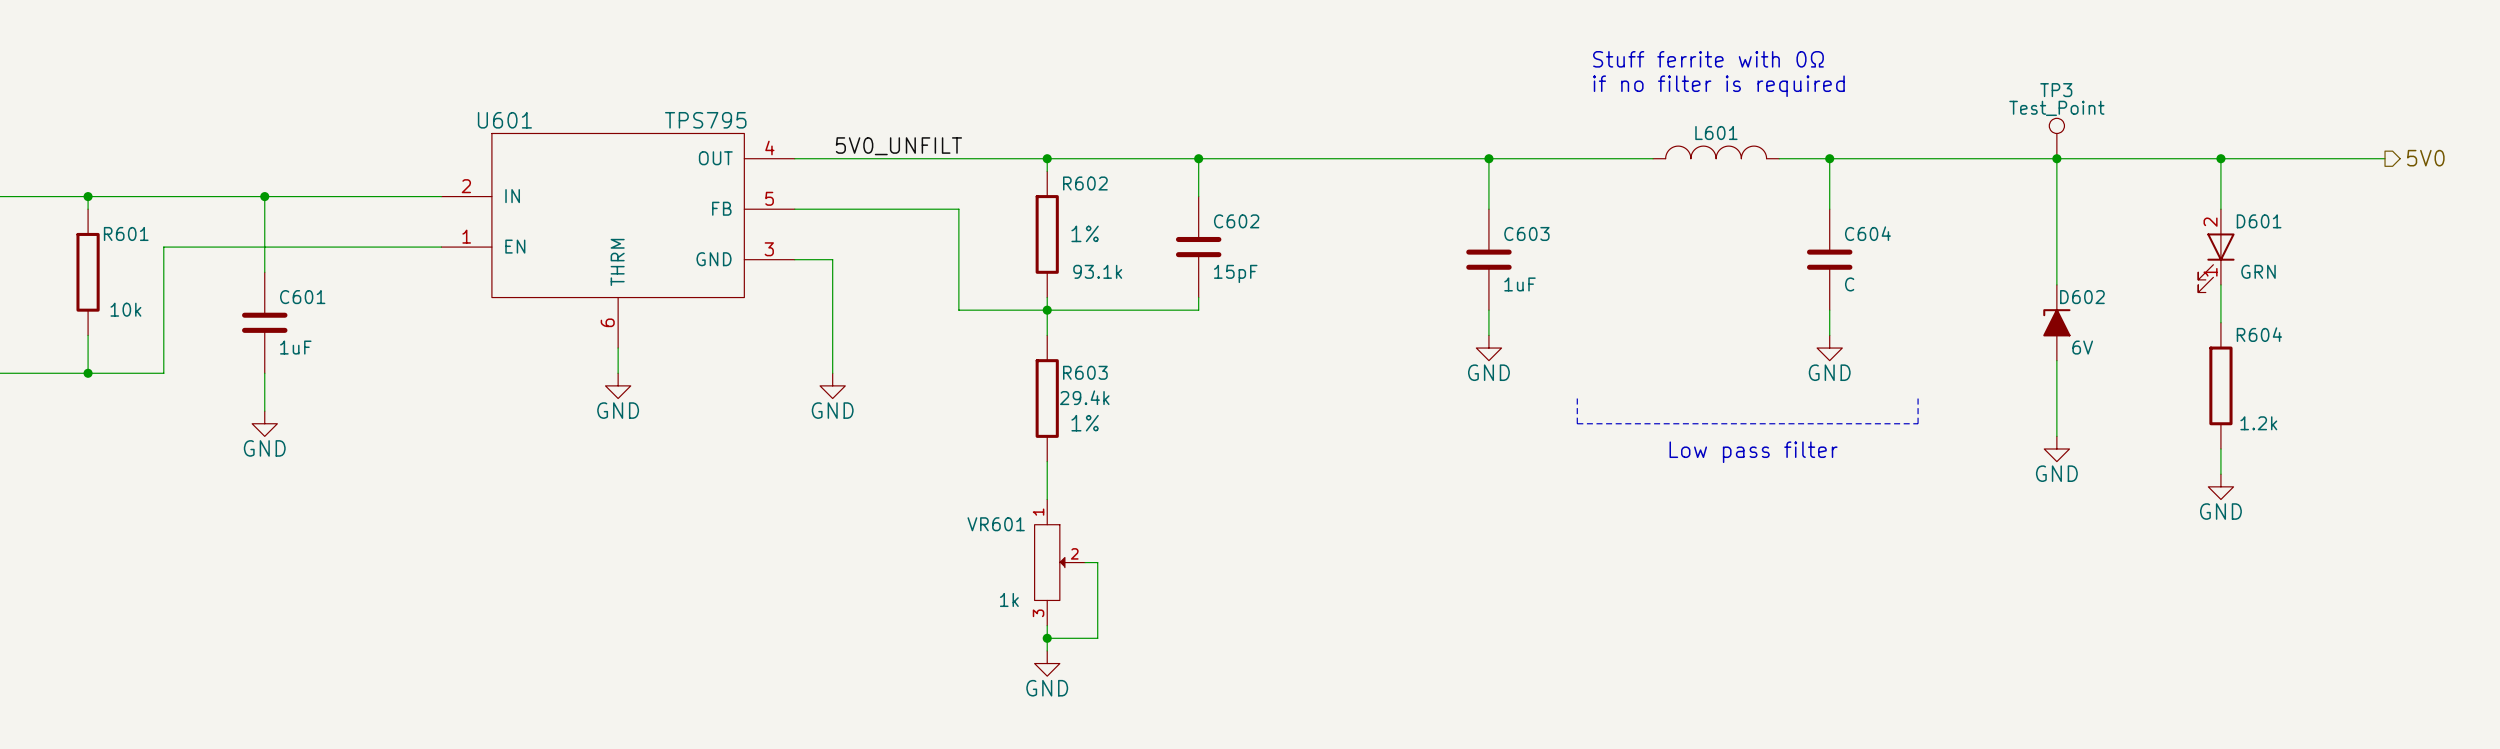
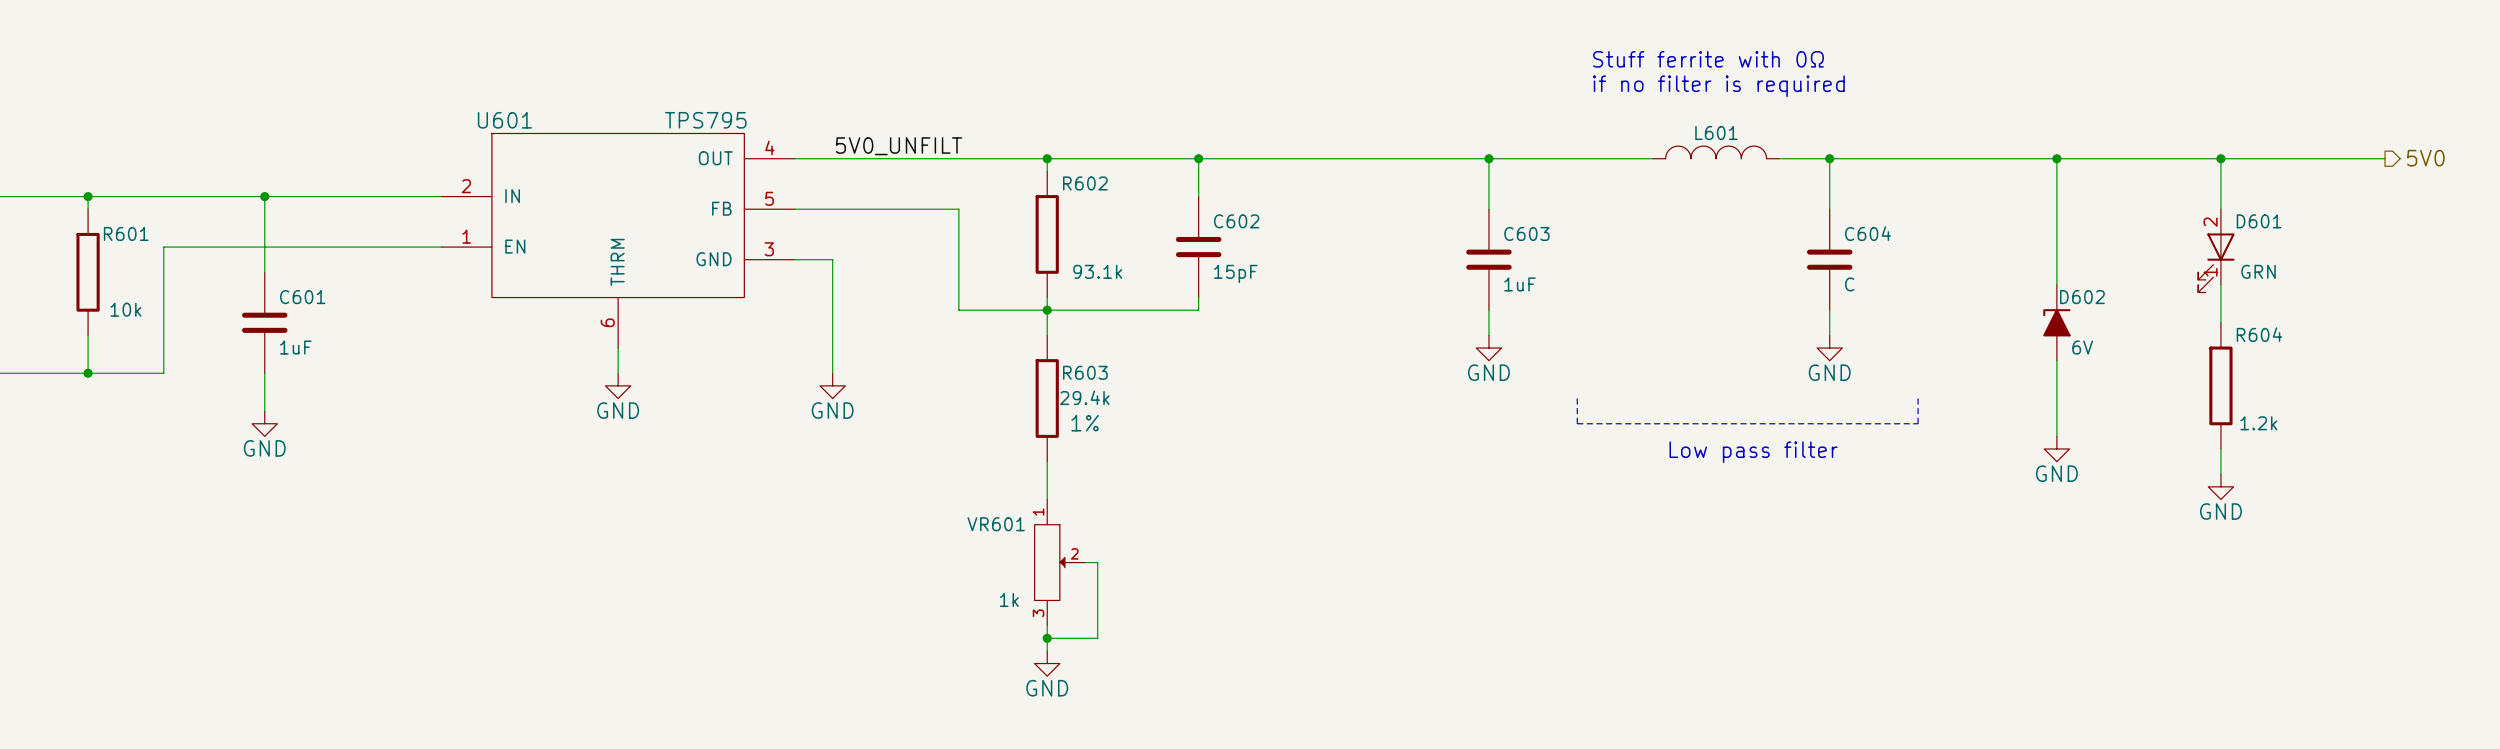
TP3: Test_Point (2056, 138) -> none
R602 text: 1% (1085, 233) -> none

